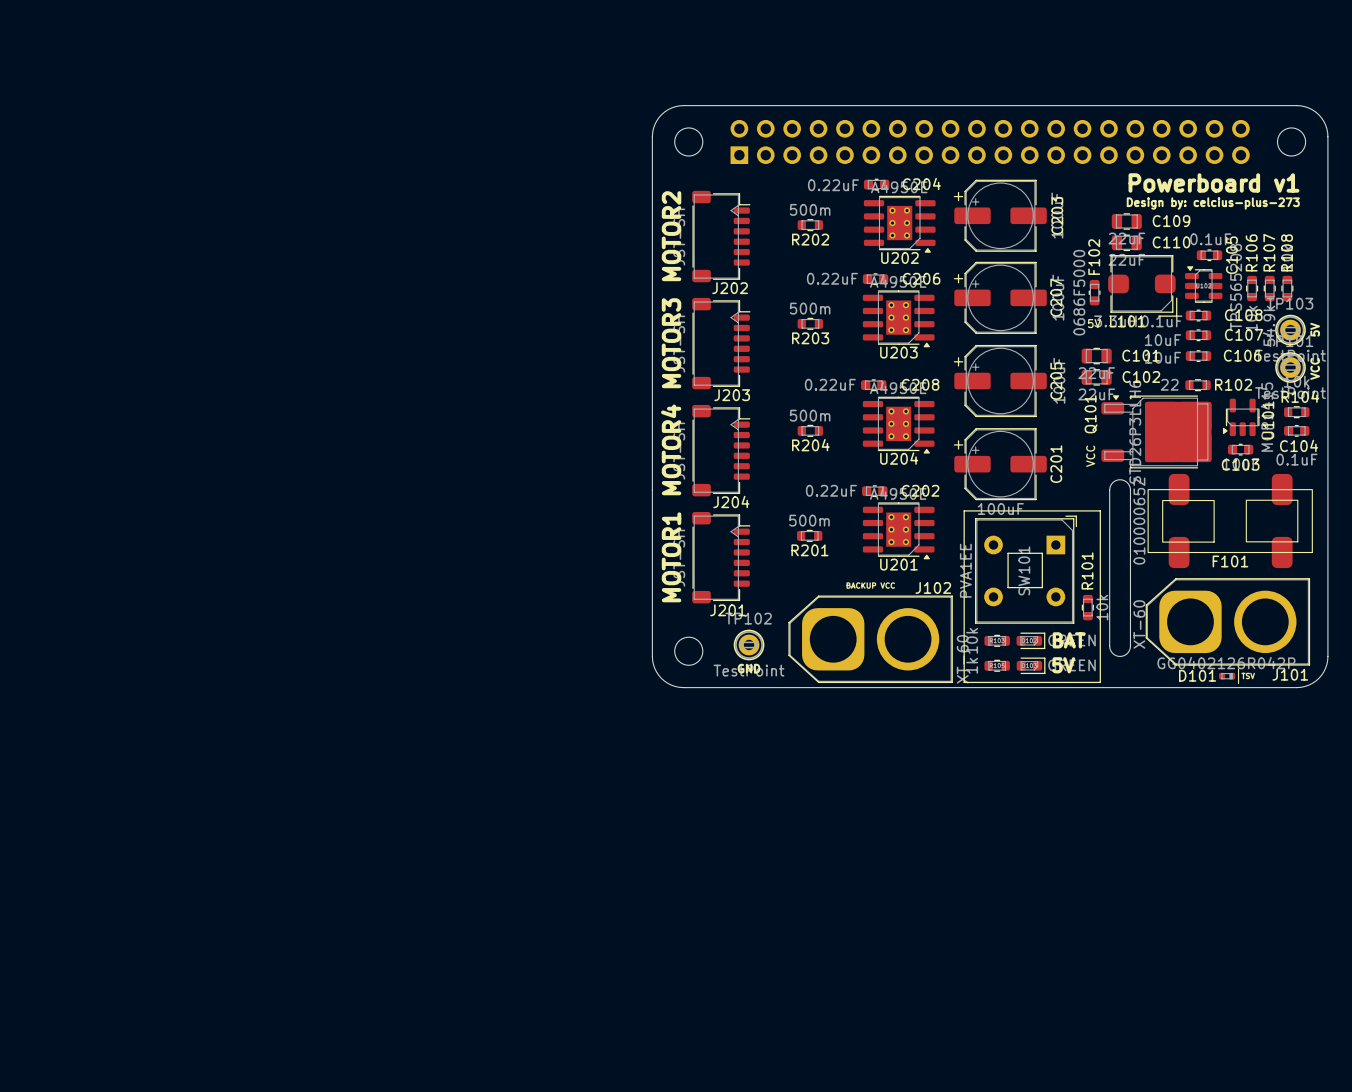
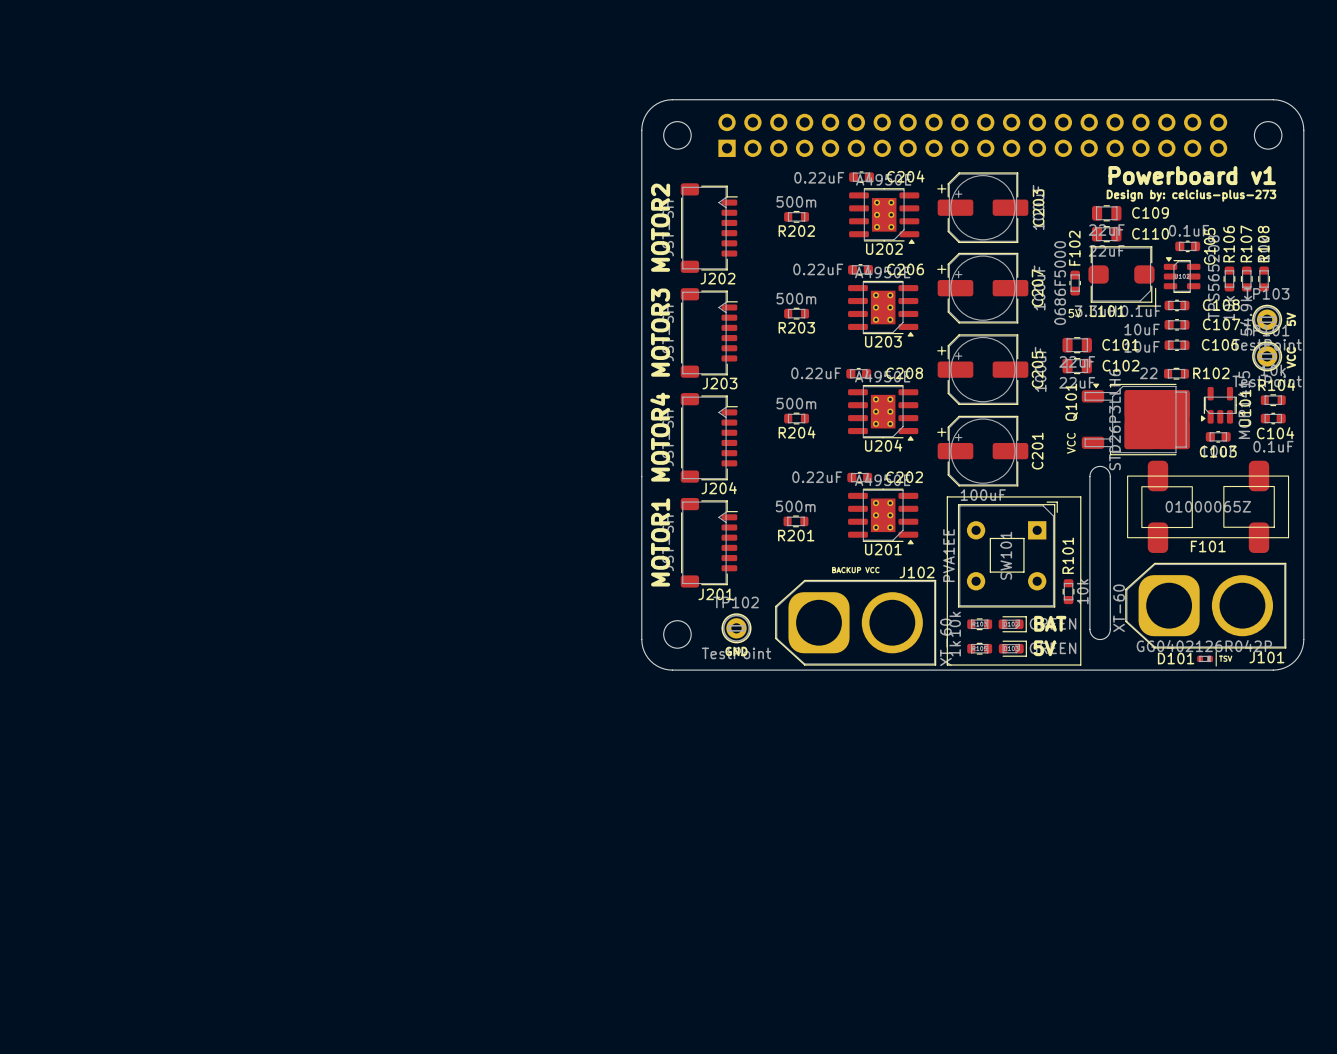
F101 value rotation: 0° (1139, 521) -> 90° clockwise (1208, 506)

